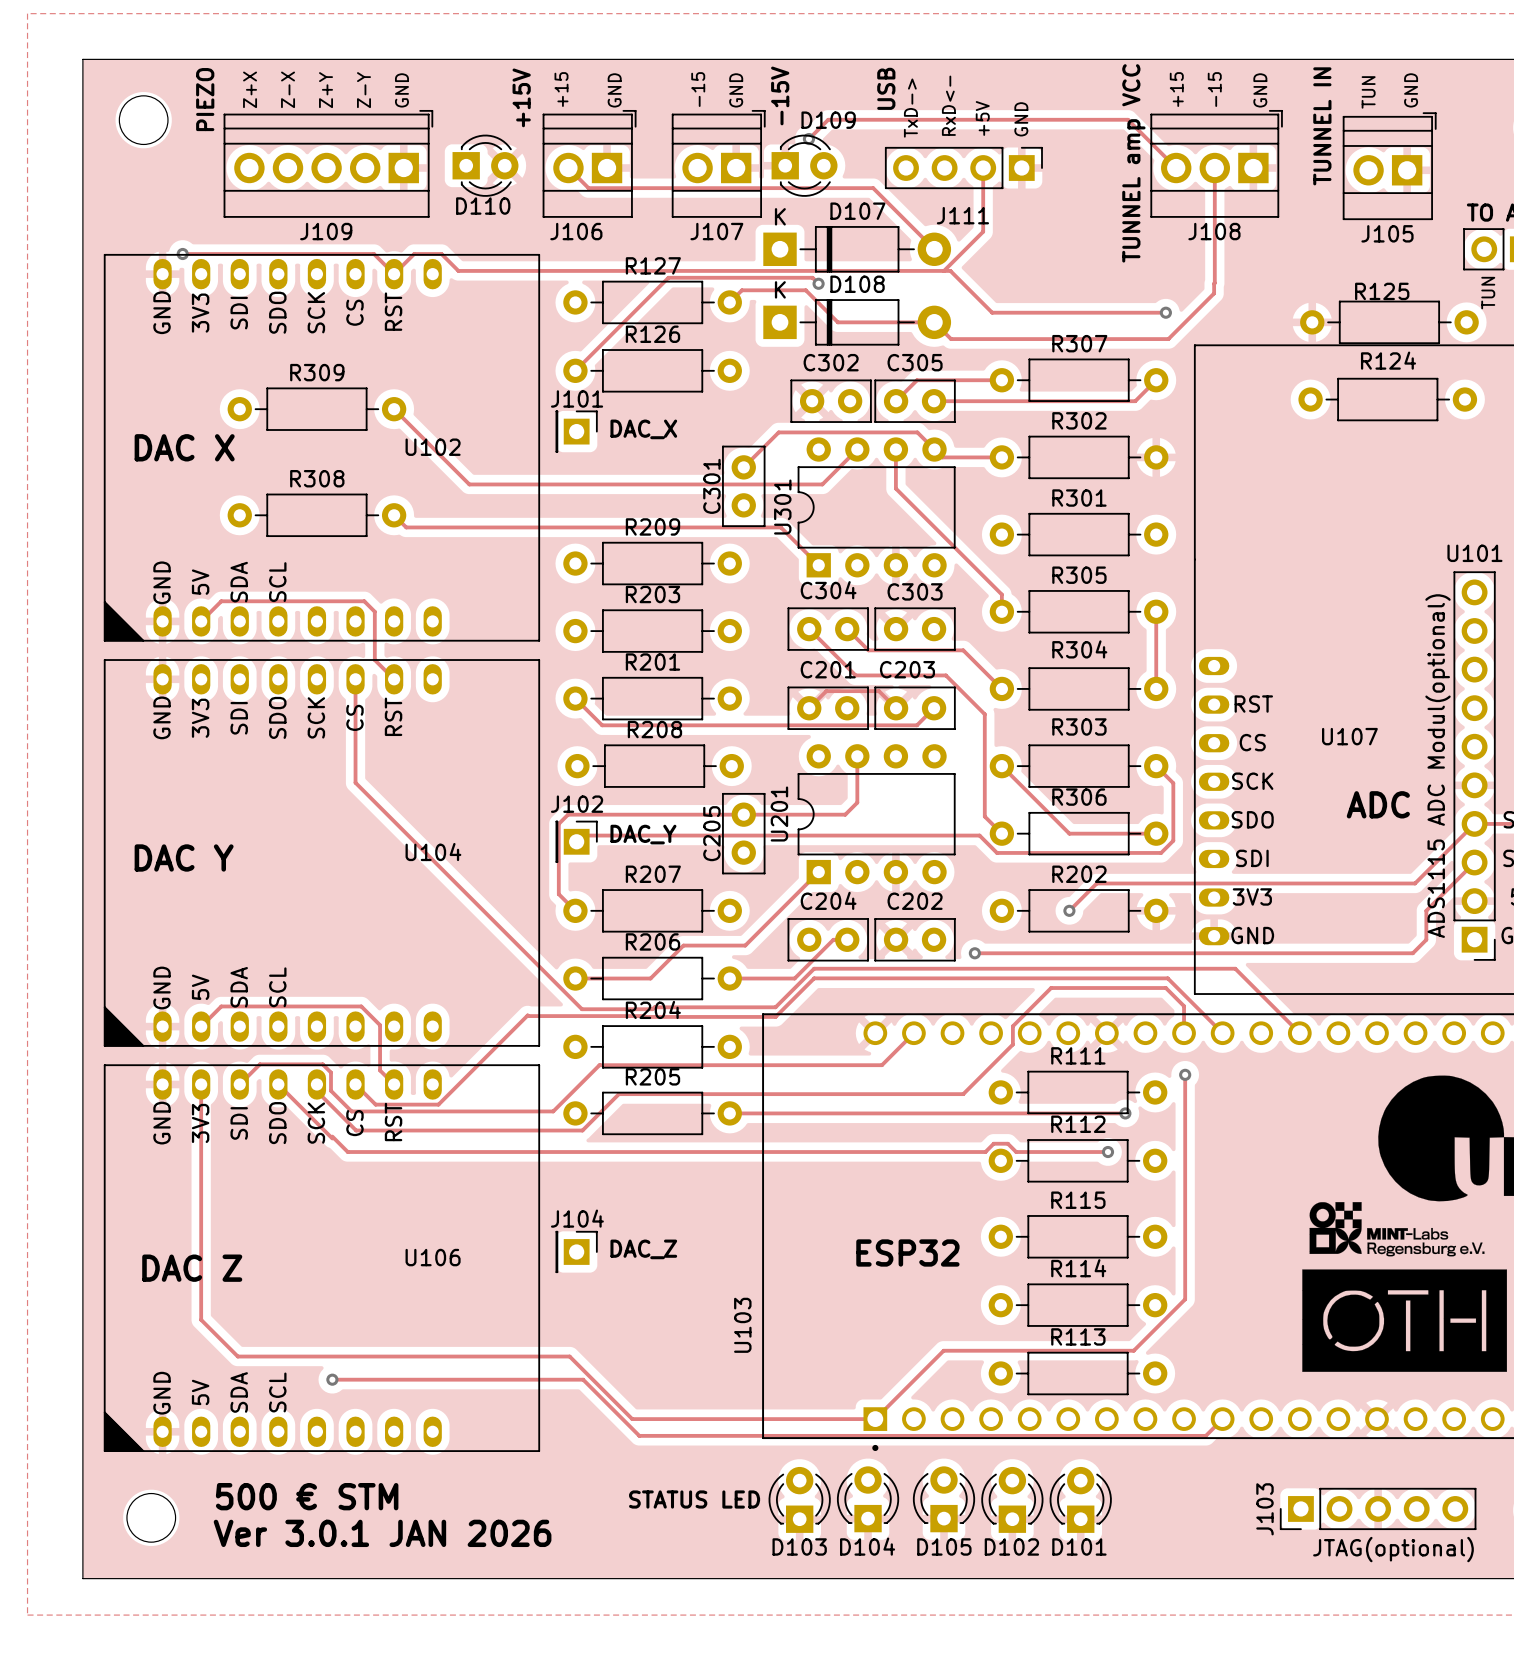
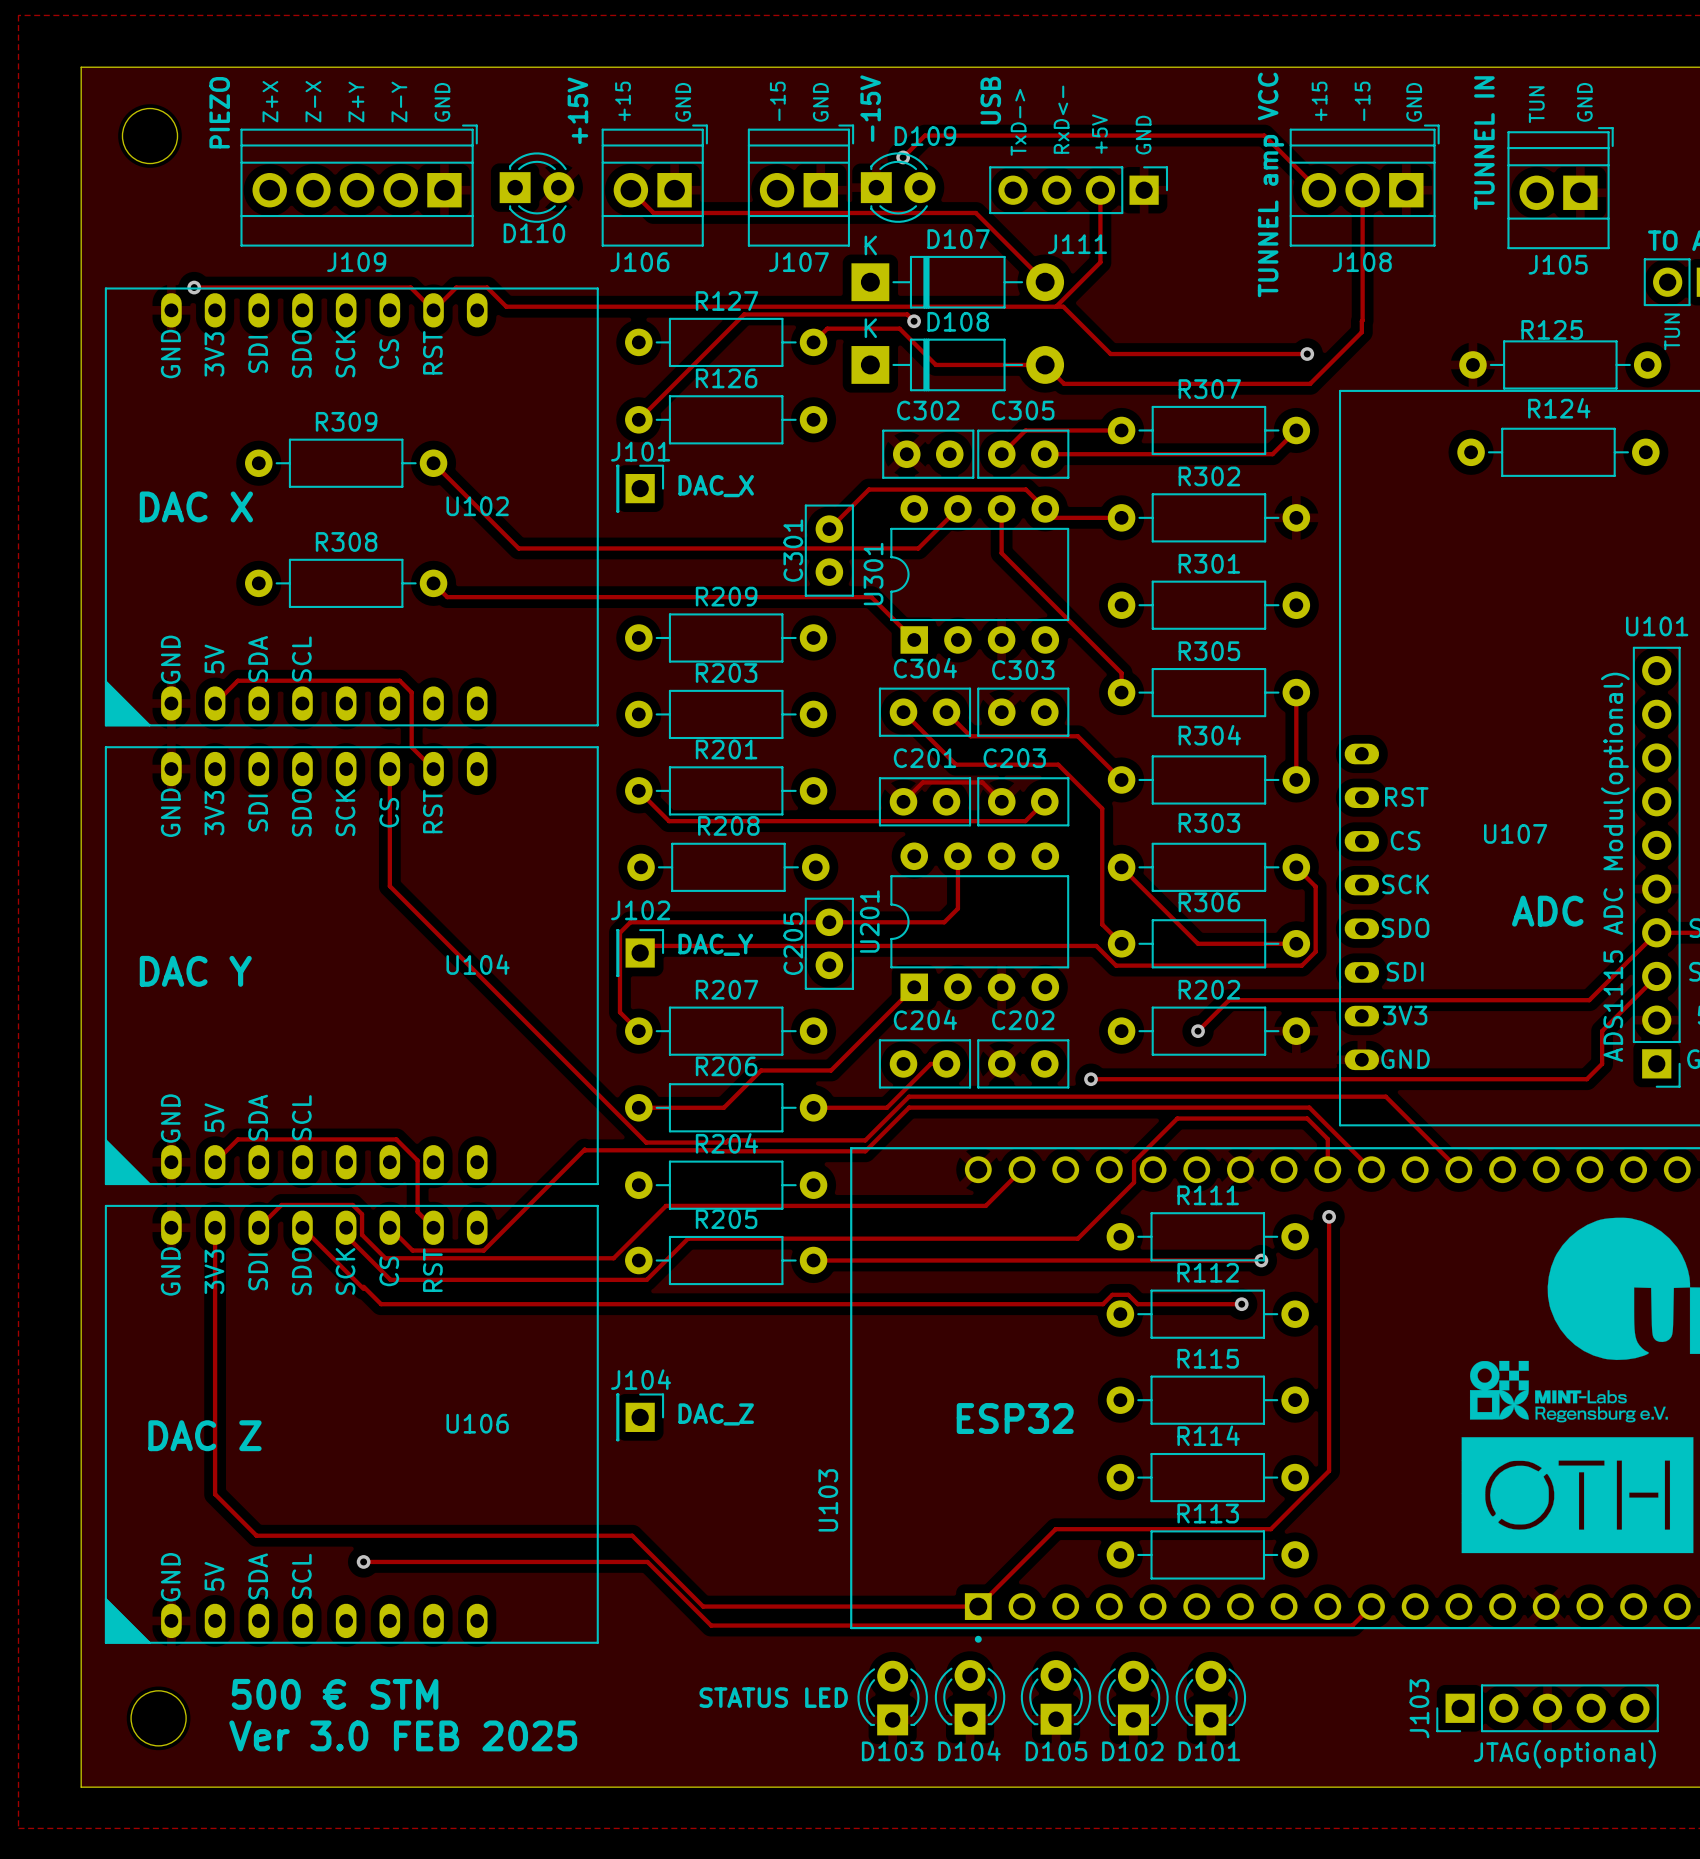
text: Ver 3.0.1 JAN 2026 (382, 1533) -> Ver 3.0 FEB 2025 (403, 1735)

